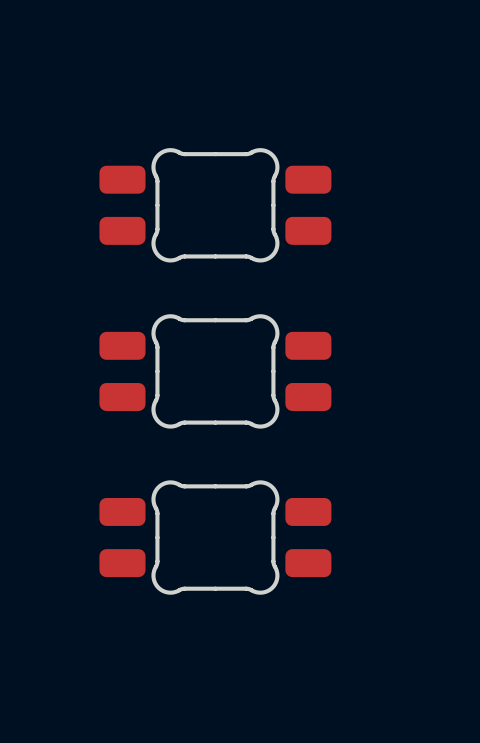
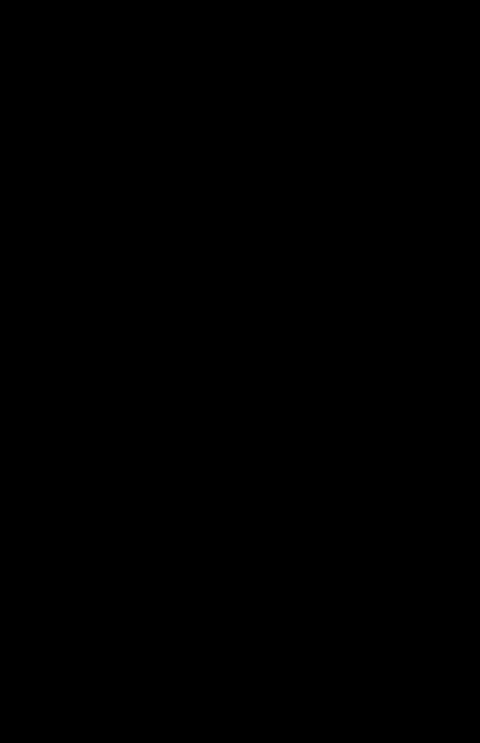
part: (215, 205) -> none
part: (215, 371) -> none
part: (215, 537) -> none

